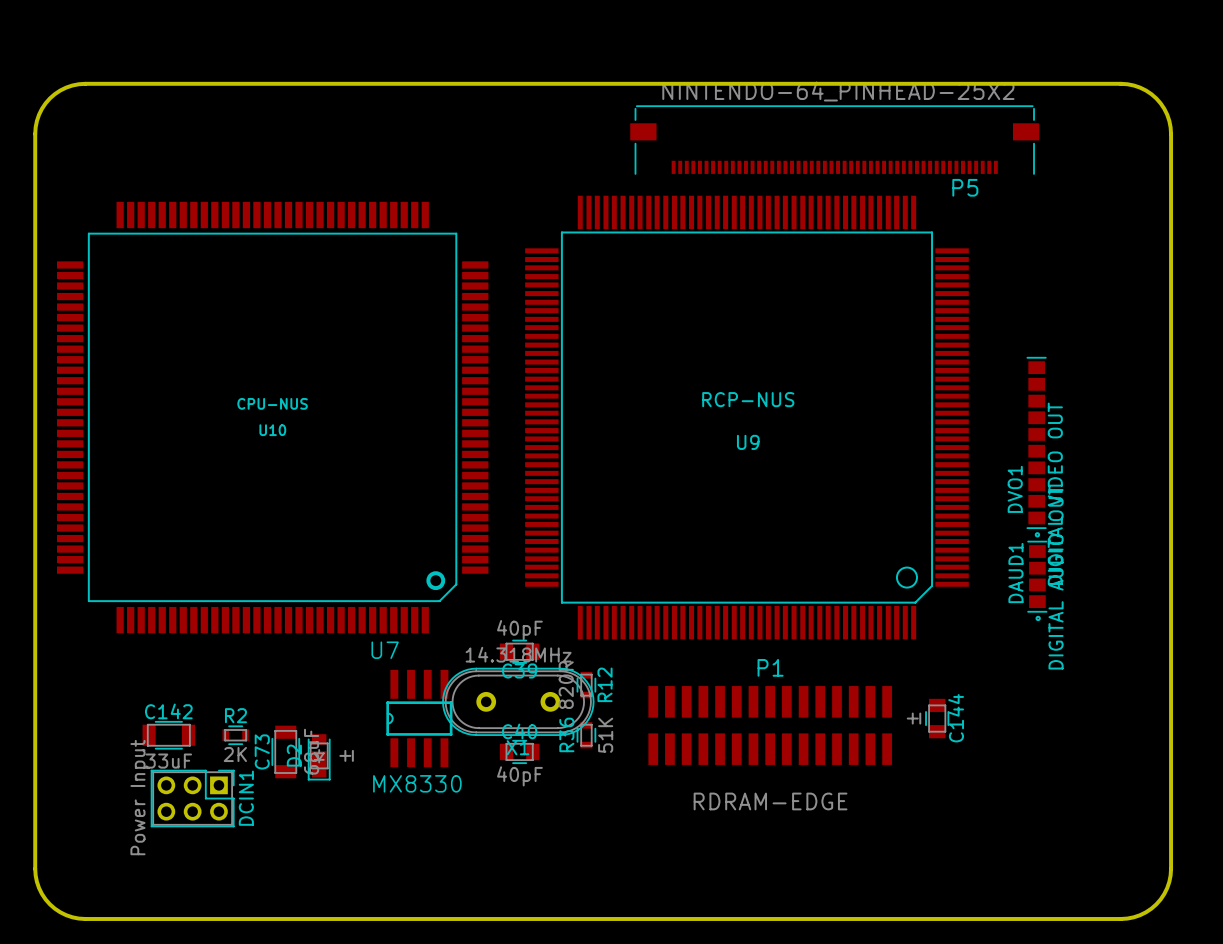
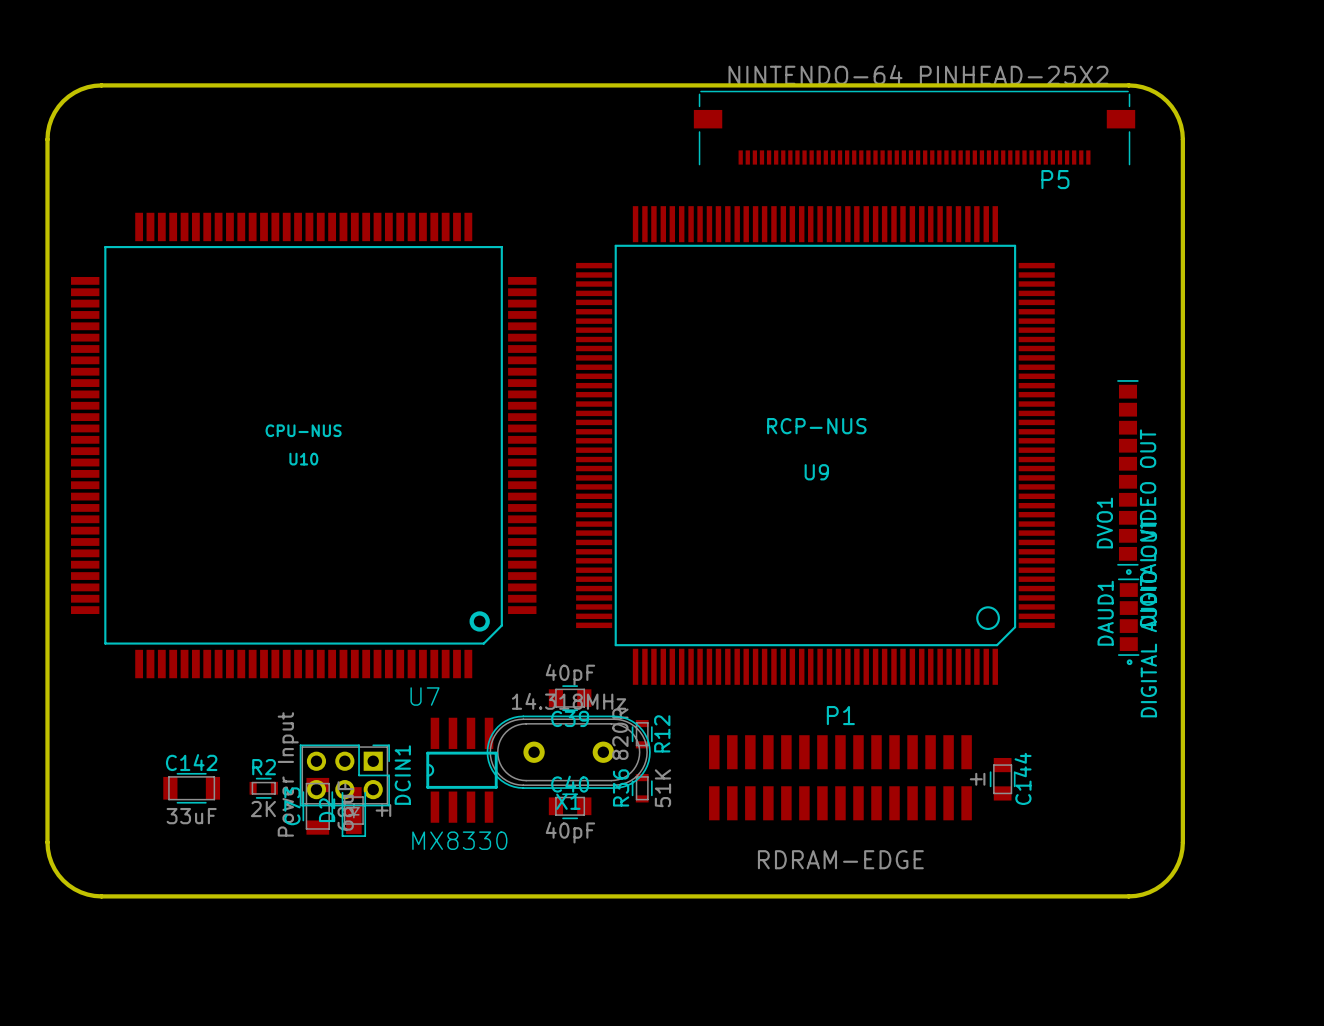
board edge: (1037, 83) (1133, 85) (1146, 90) (1156, 98) (1167, 114) (1170, 127) (1171, 868) (1167, 888) (1160, 899) (1151, 908) (1140, 915) (1120, 918) (78, 918) (66, 915) (49, 904) (41, 893) (36, 881) (35, 785) -> (1128, 85) (1149, 89) (1167, 101) (1178, 118) (1182, 139) (1182, 842) (1178, 863) (1171, 875) (1161, 885) (1149, 892) (1128, 896) (101, 896) (80, 892) (63, 880) (51, 863) (47, 842)
P5 position: (834, 140) -> (914, 128)
C144 position: (937, 718) -> (1002, 779)
DCIN1 position: (192, 798) -> (344, 775)

